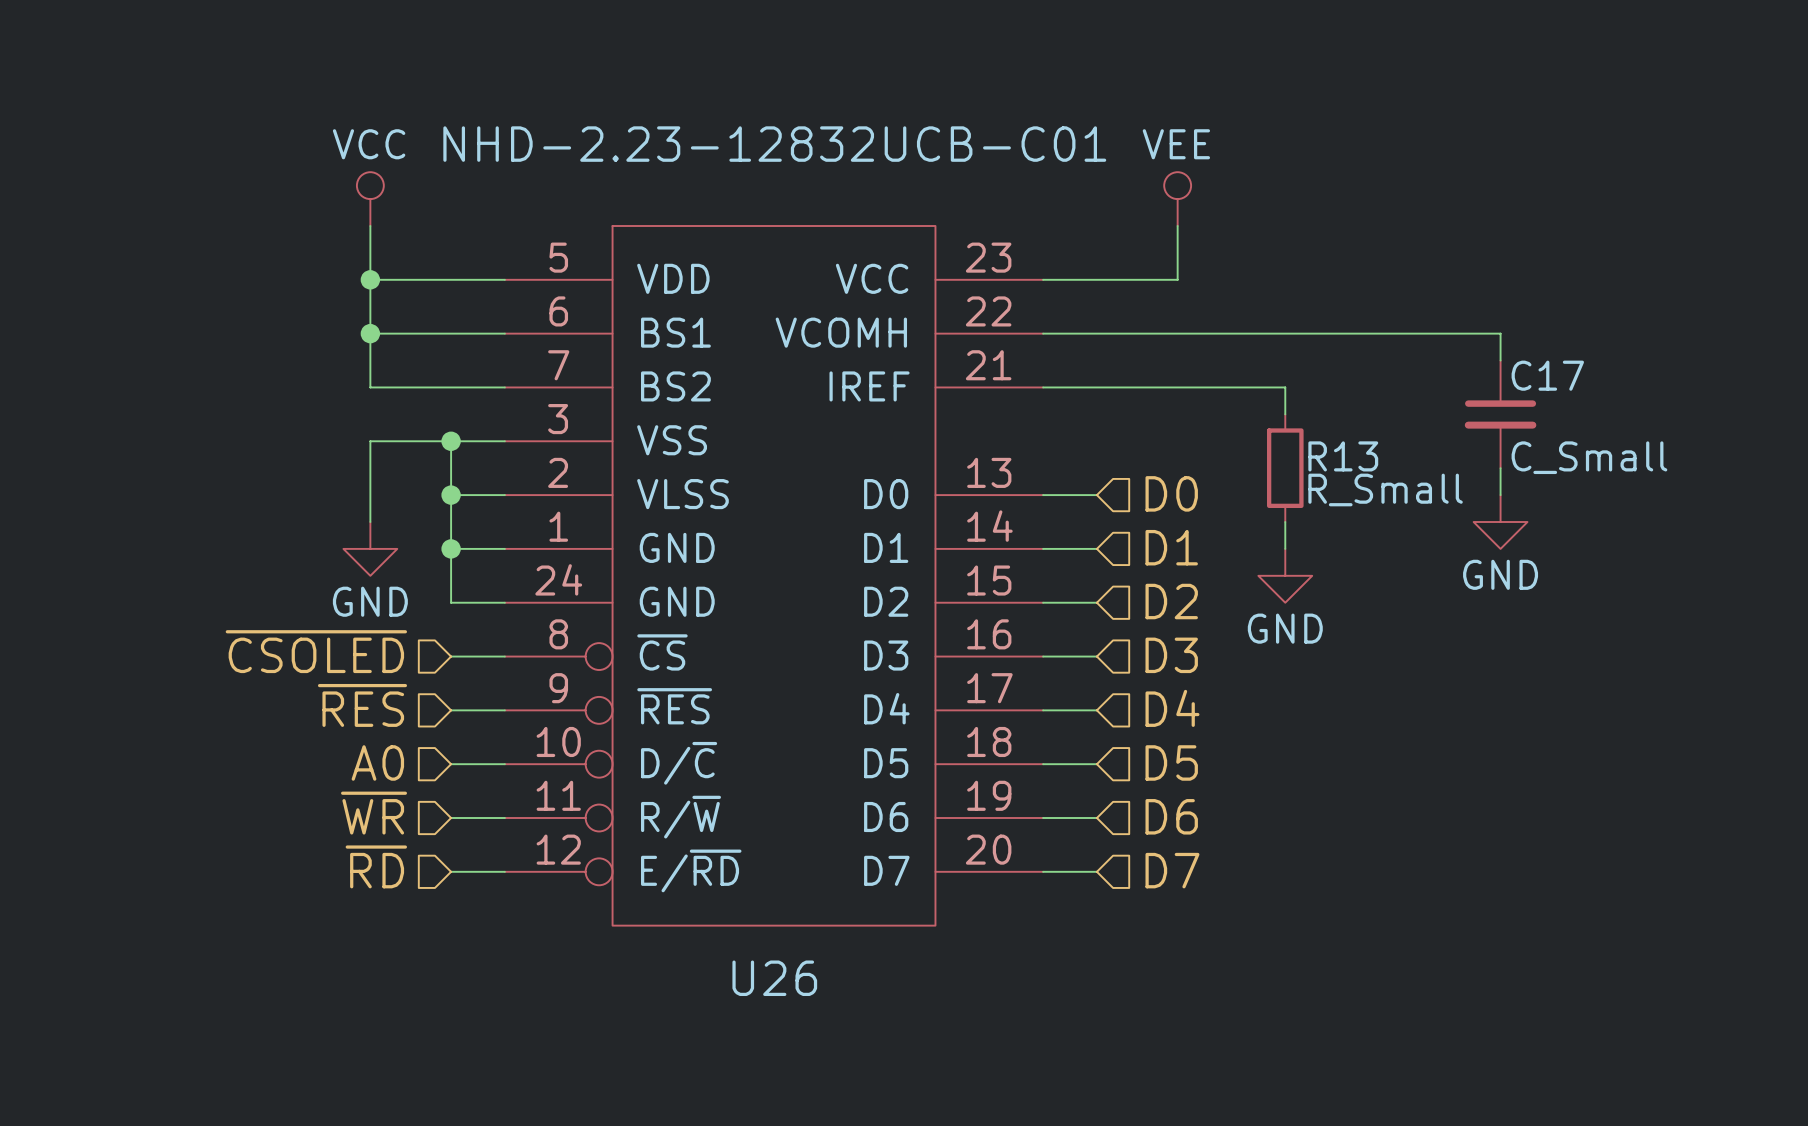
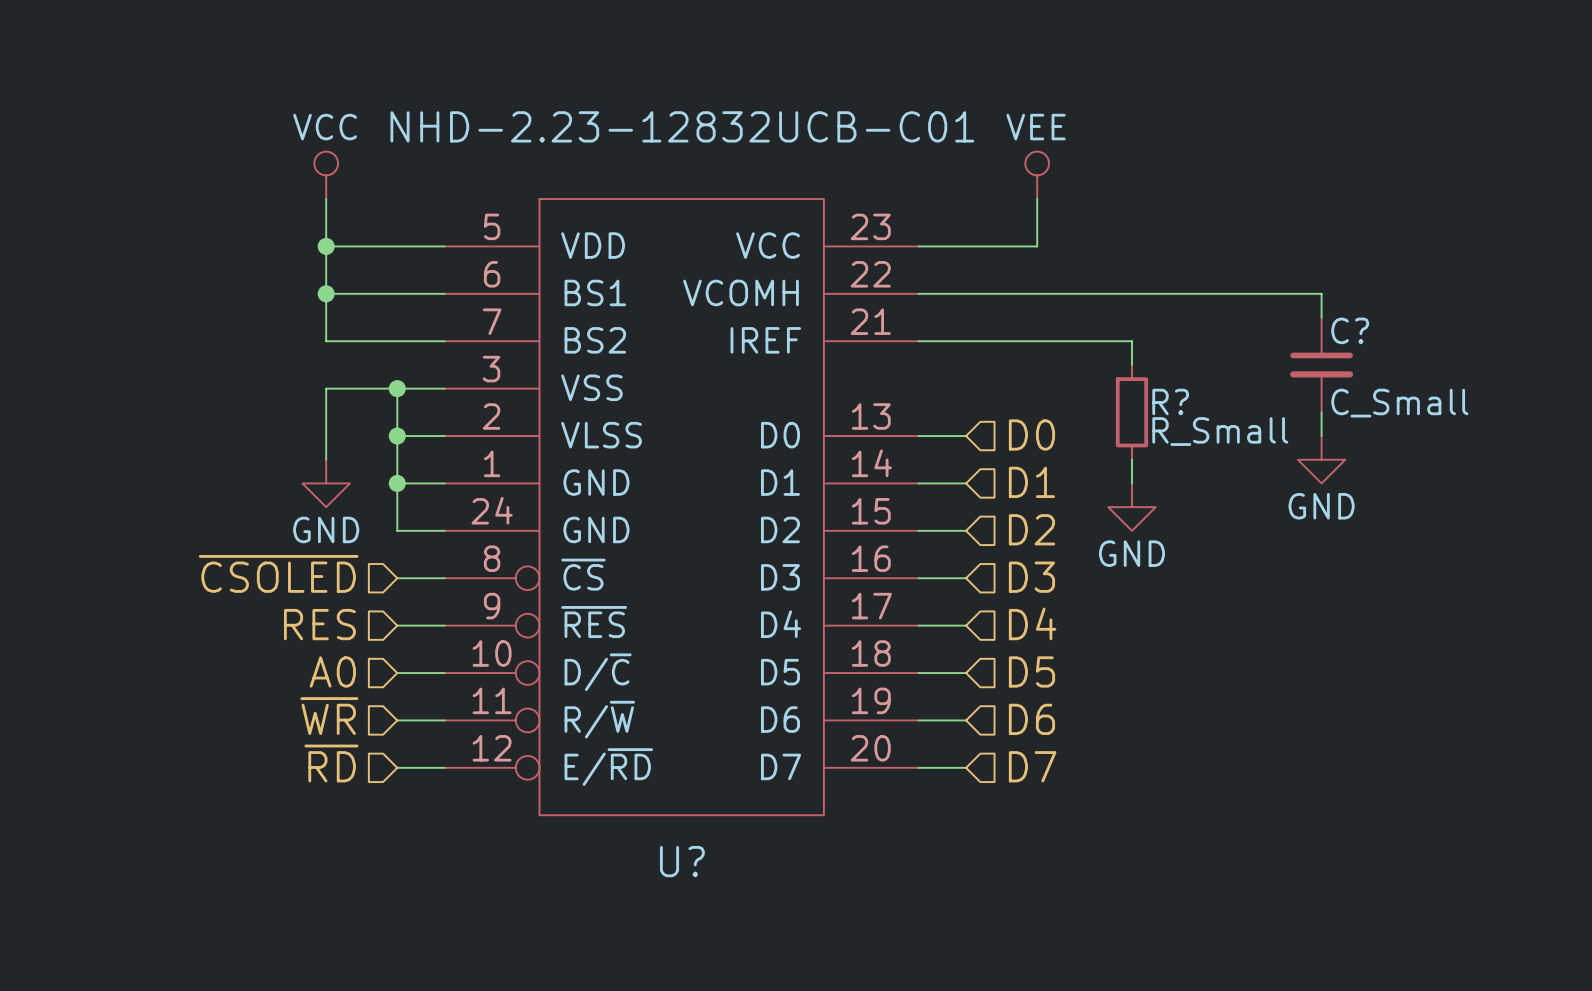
C17 name: C17 (1547, 375) -> C? (1350, 330)
R13 name: R13 (1343, 456) -> R? (1170, 401)
hierarchical label: ~{RES} (362, 705) -> RES (319, 624)
U26 name: U26 (774, 978) -> U? (682, 861)

